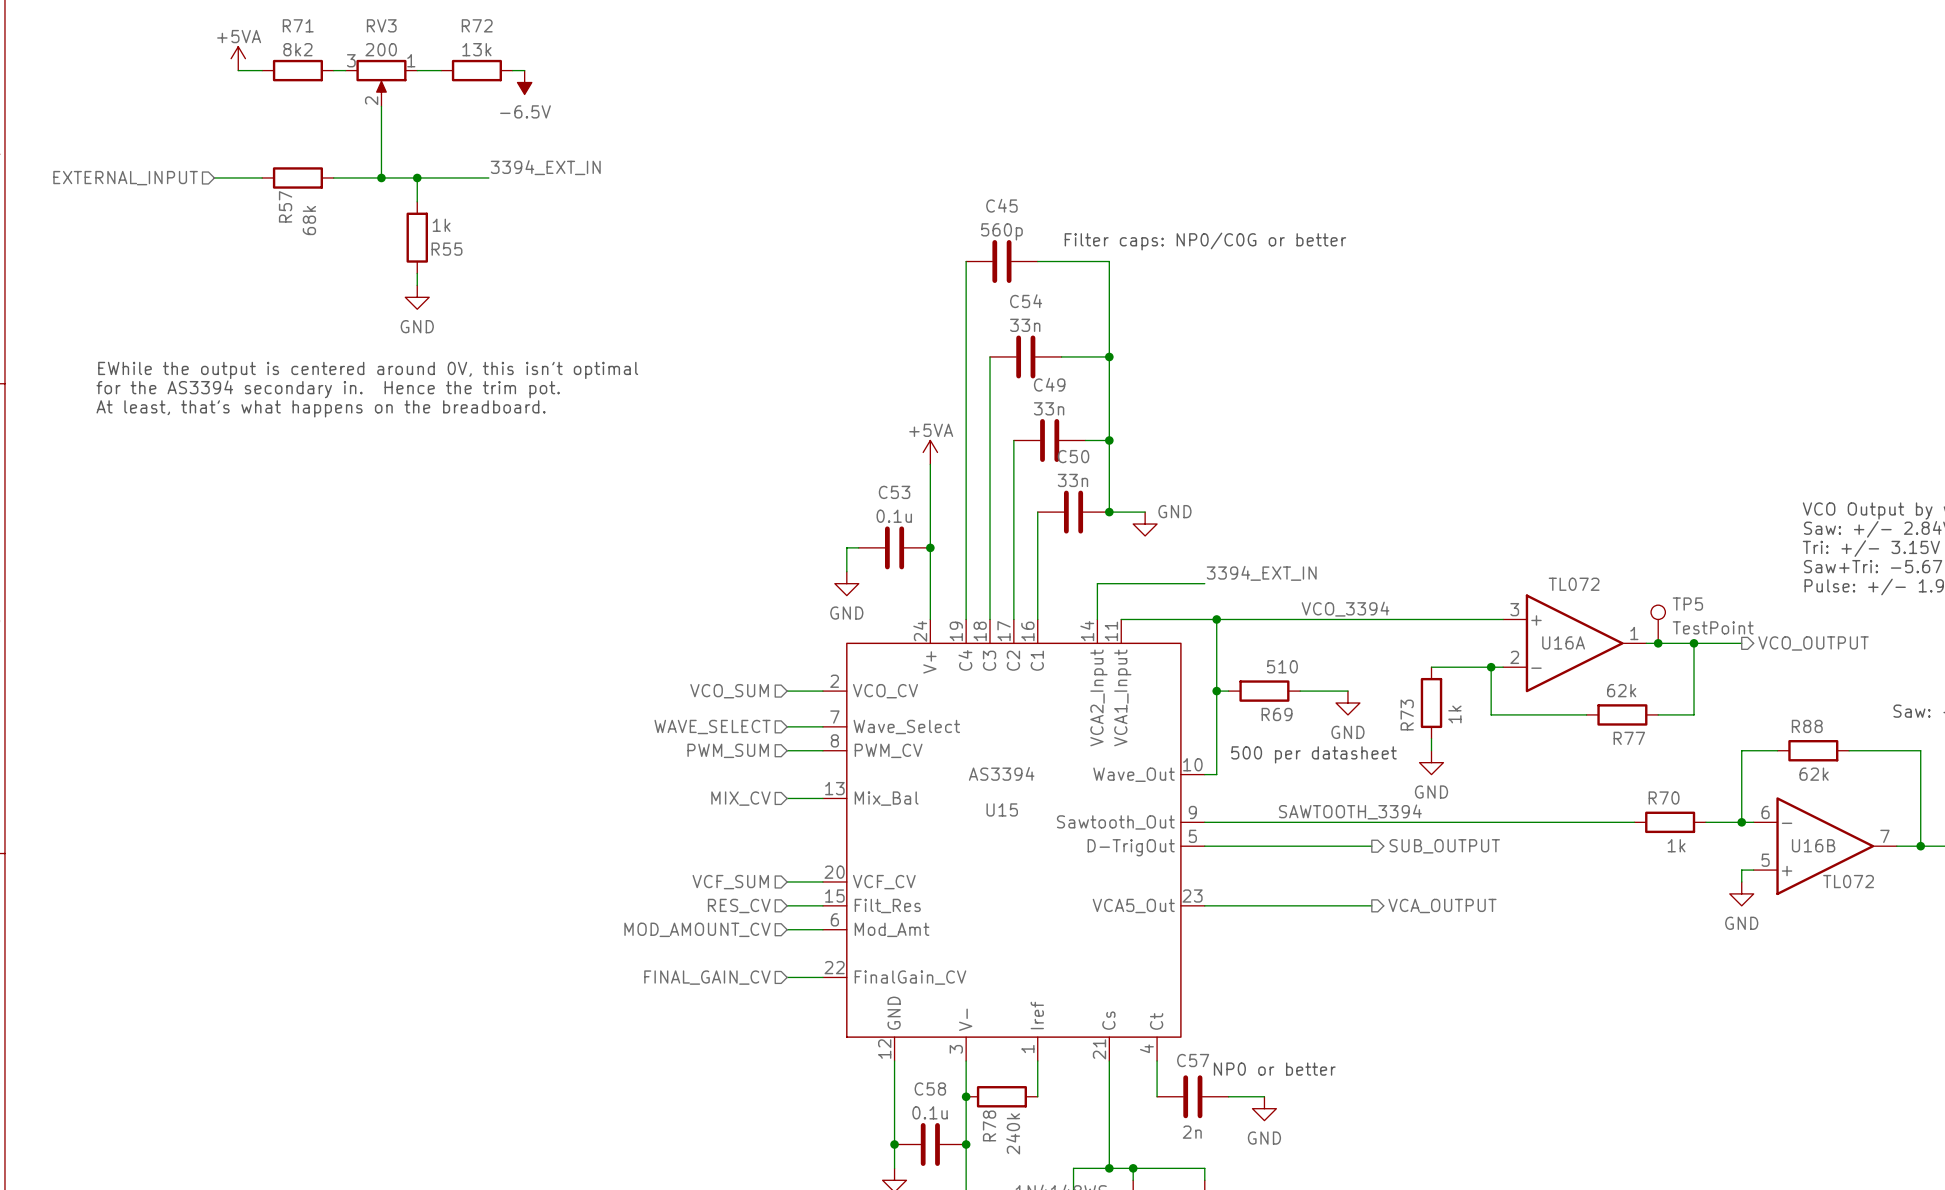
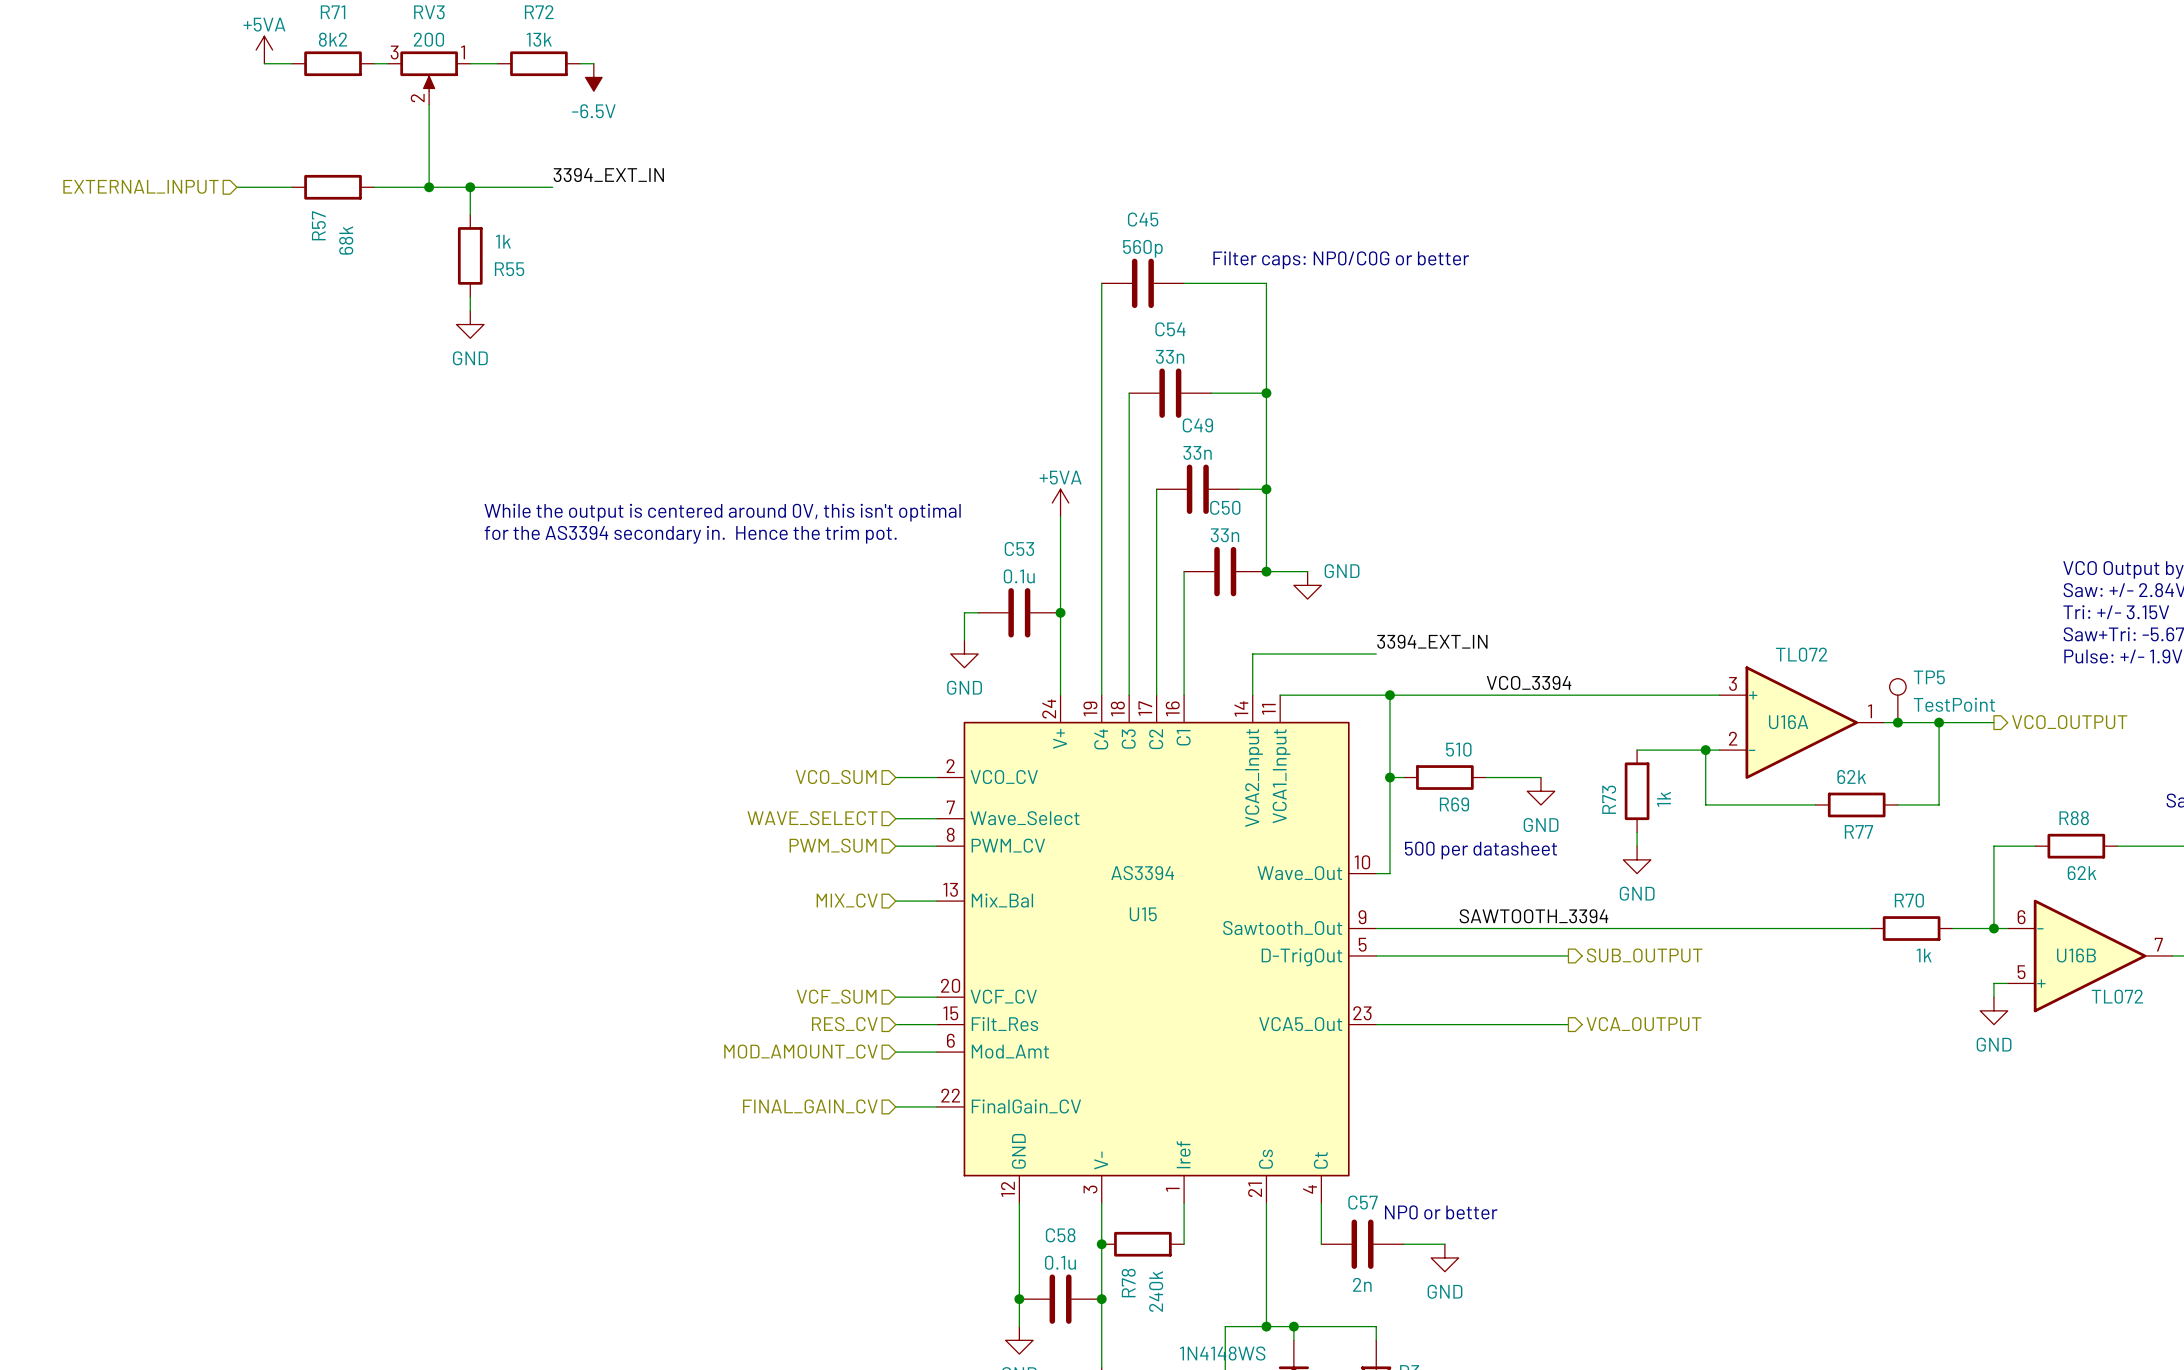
text: EWhile the output is centered around 0V, this isn't optimal (368, 370) -> none
text: for the AS3394 secondary in. Hence the trim pot. (328, 389) -> none
text: At least, that's what happens on the breadboard. (321, 408) -> none
text: none -> While the output is centered around 0V, this isn't optimal (722, 512)
text: none -> for the AS3394 secondary in. Hence the trim pot. (690, 534)

